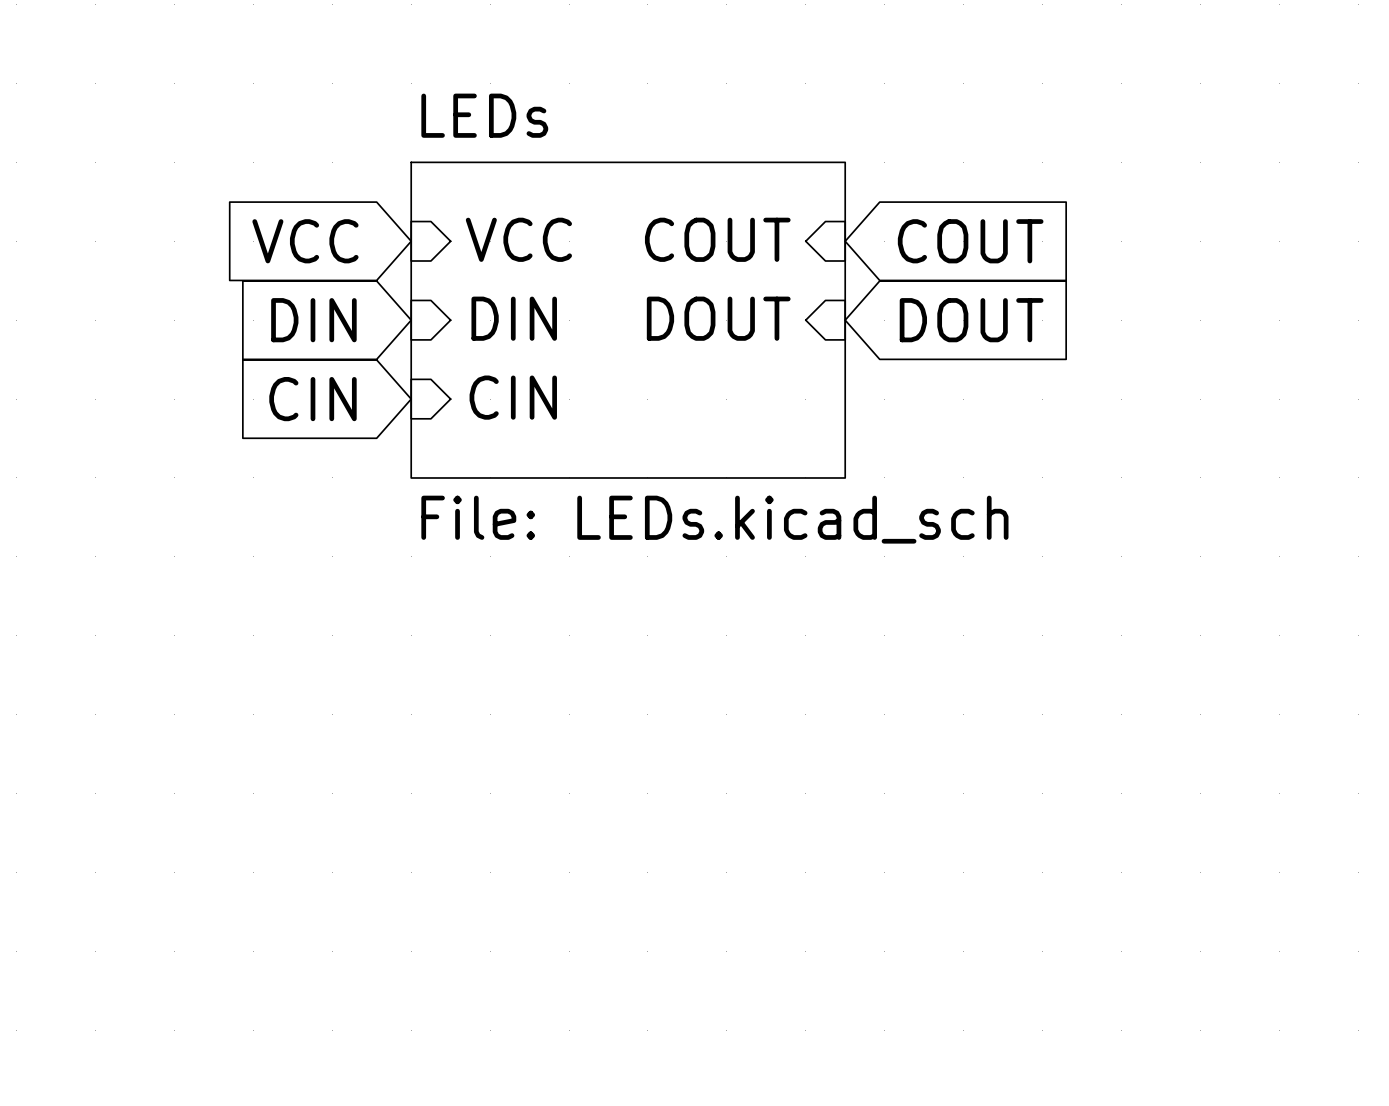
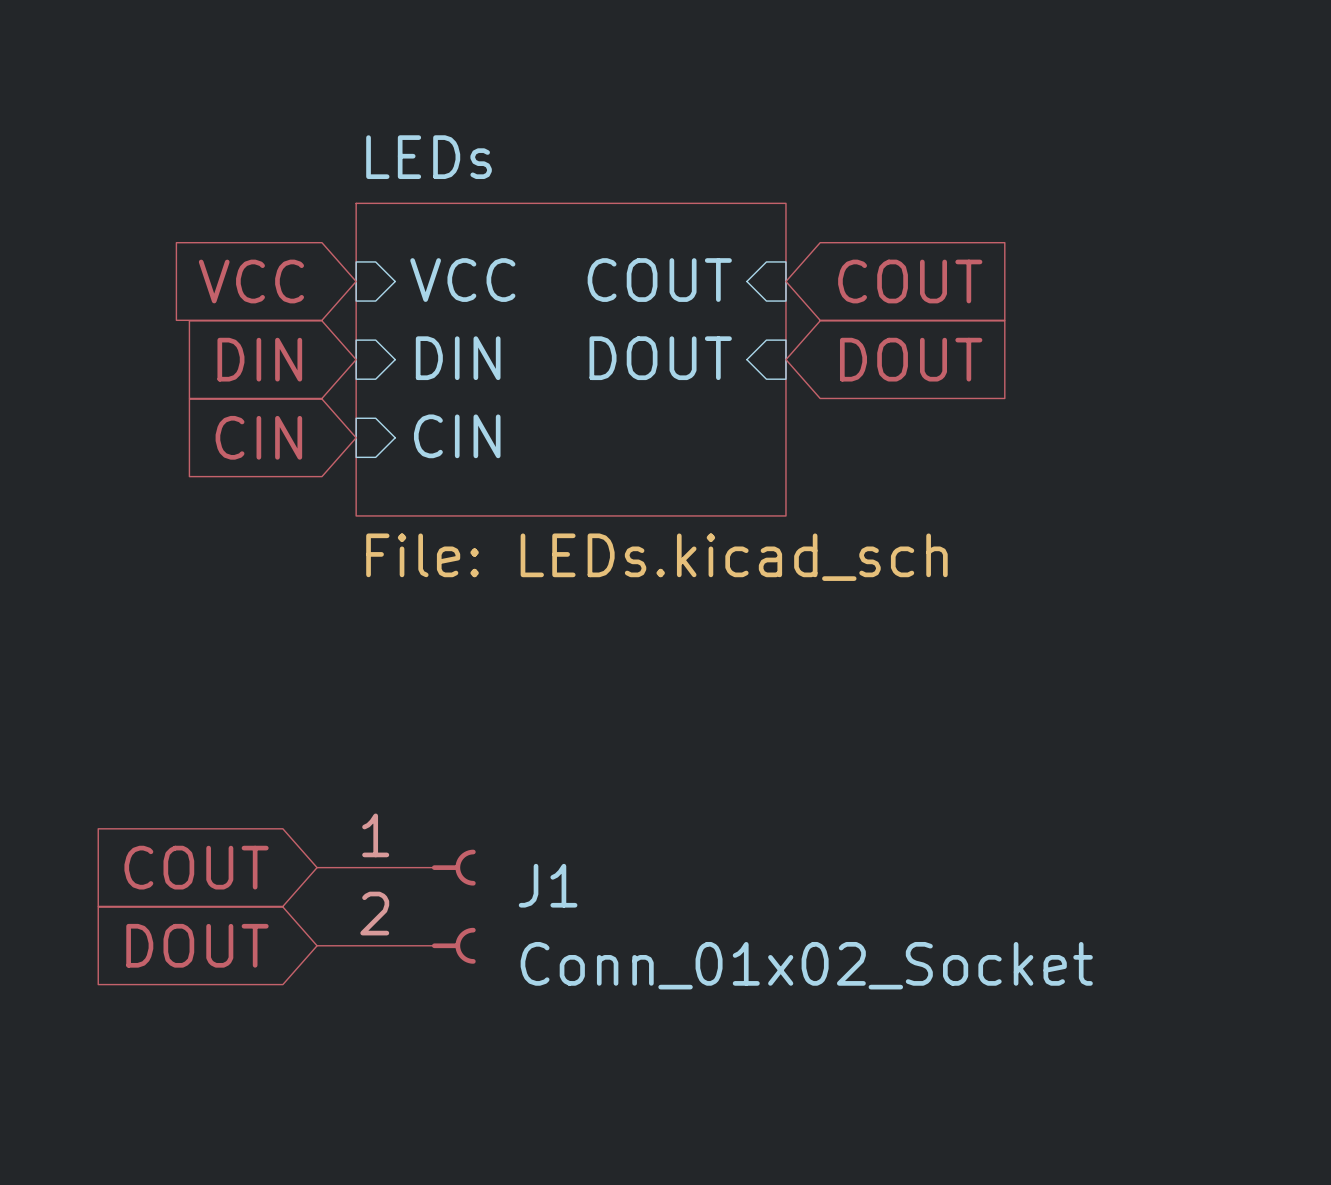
global label: none -> COUT (196, 867)
J1: none -> Conn_01x02_Socket (396, 906)
global label: none -> DOUT (197, 945)

